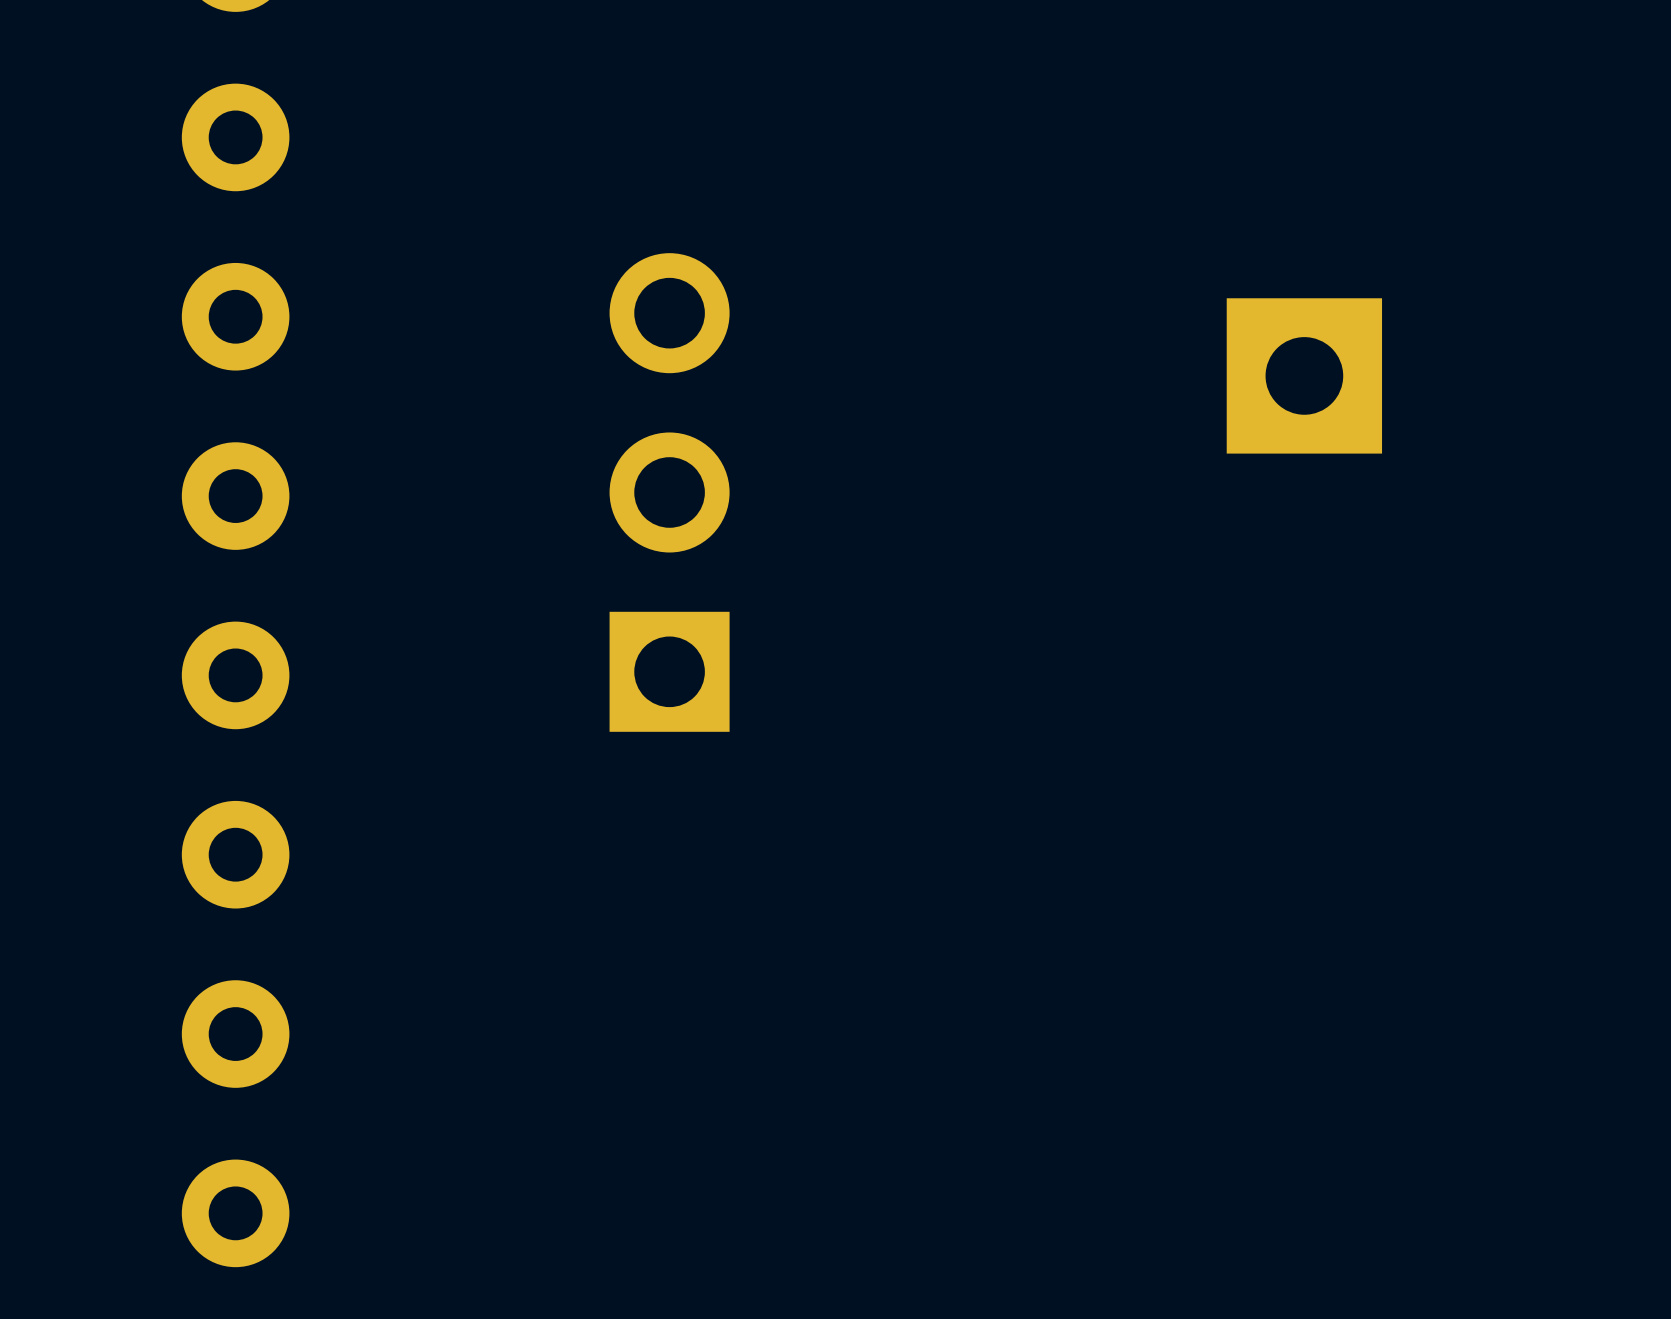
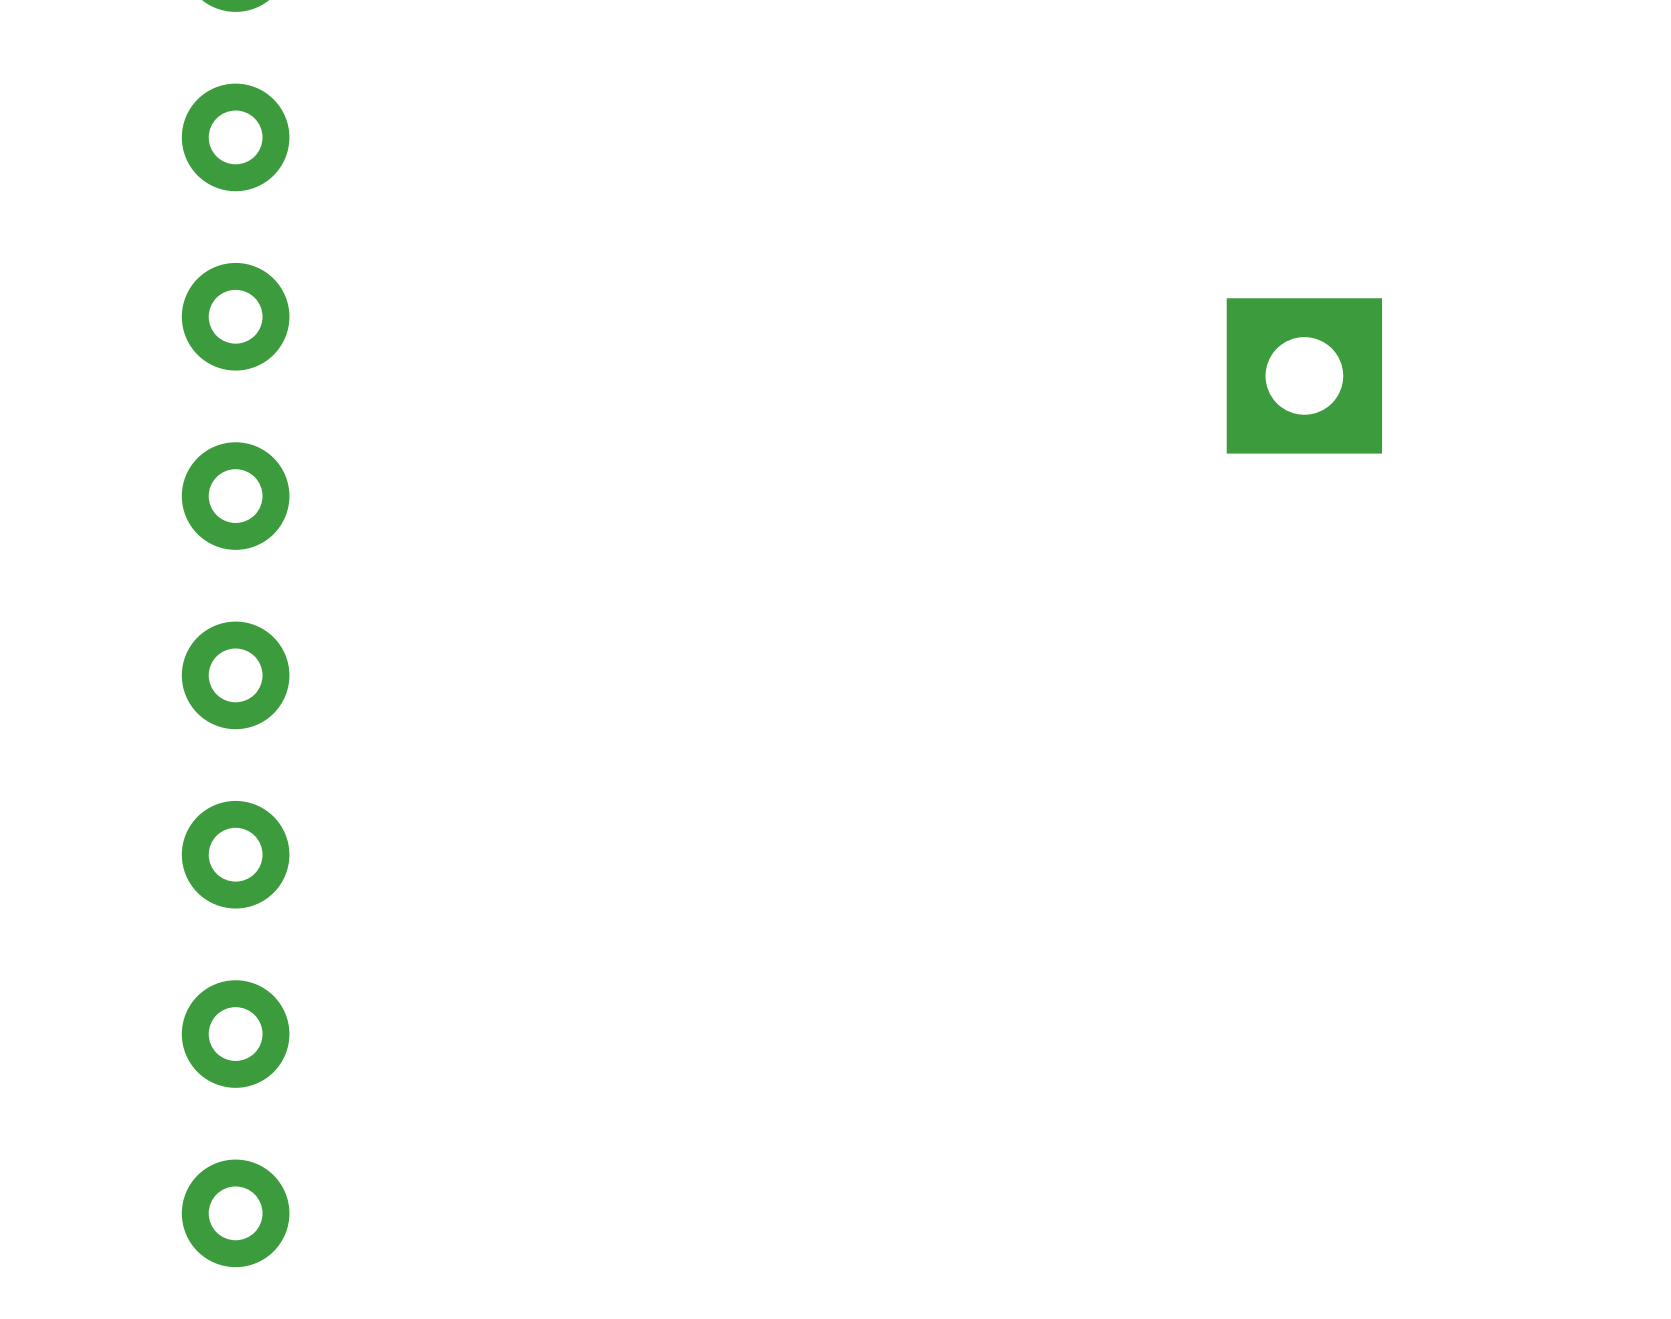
part: (669, 492) -> none

